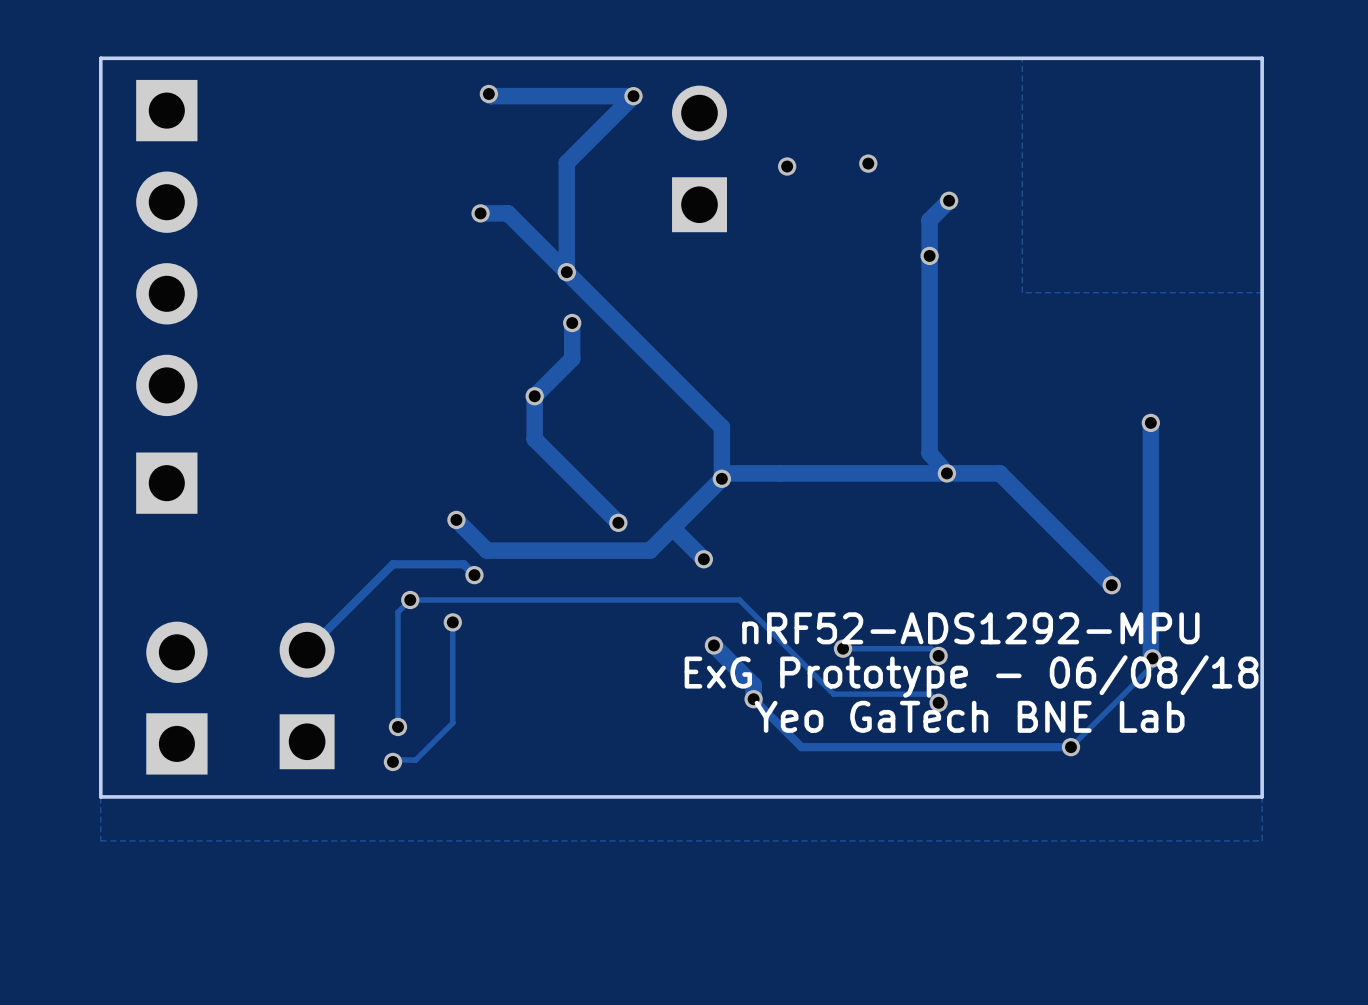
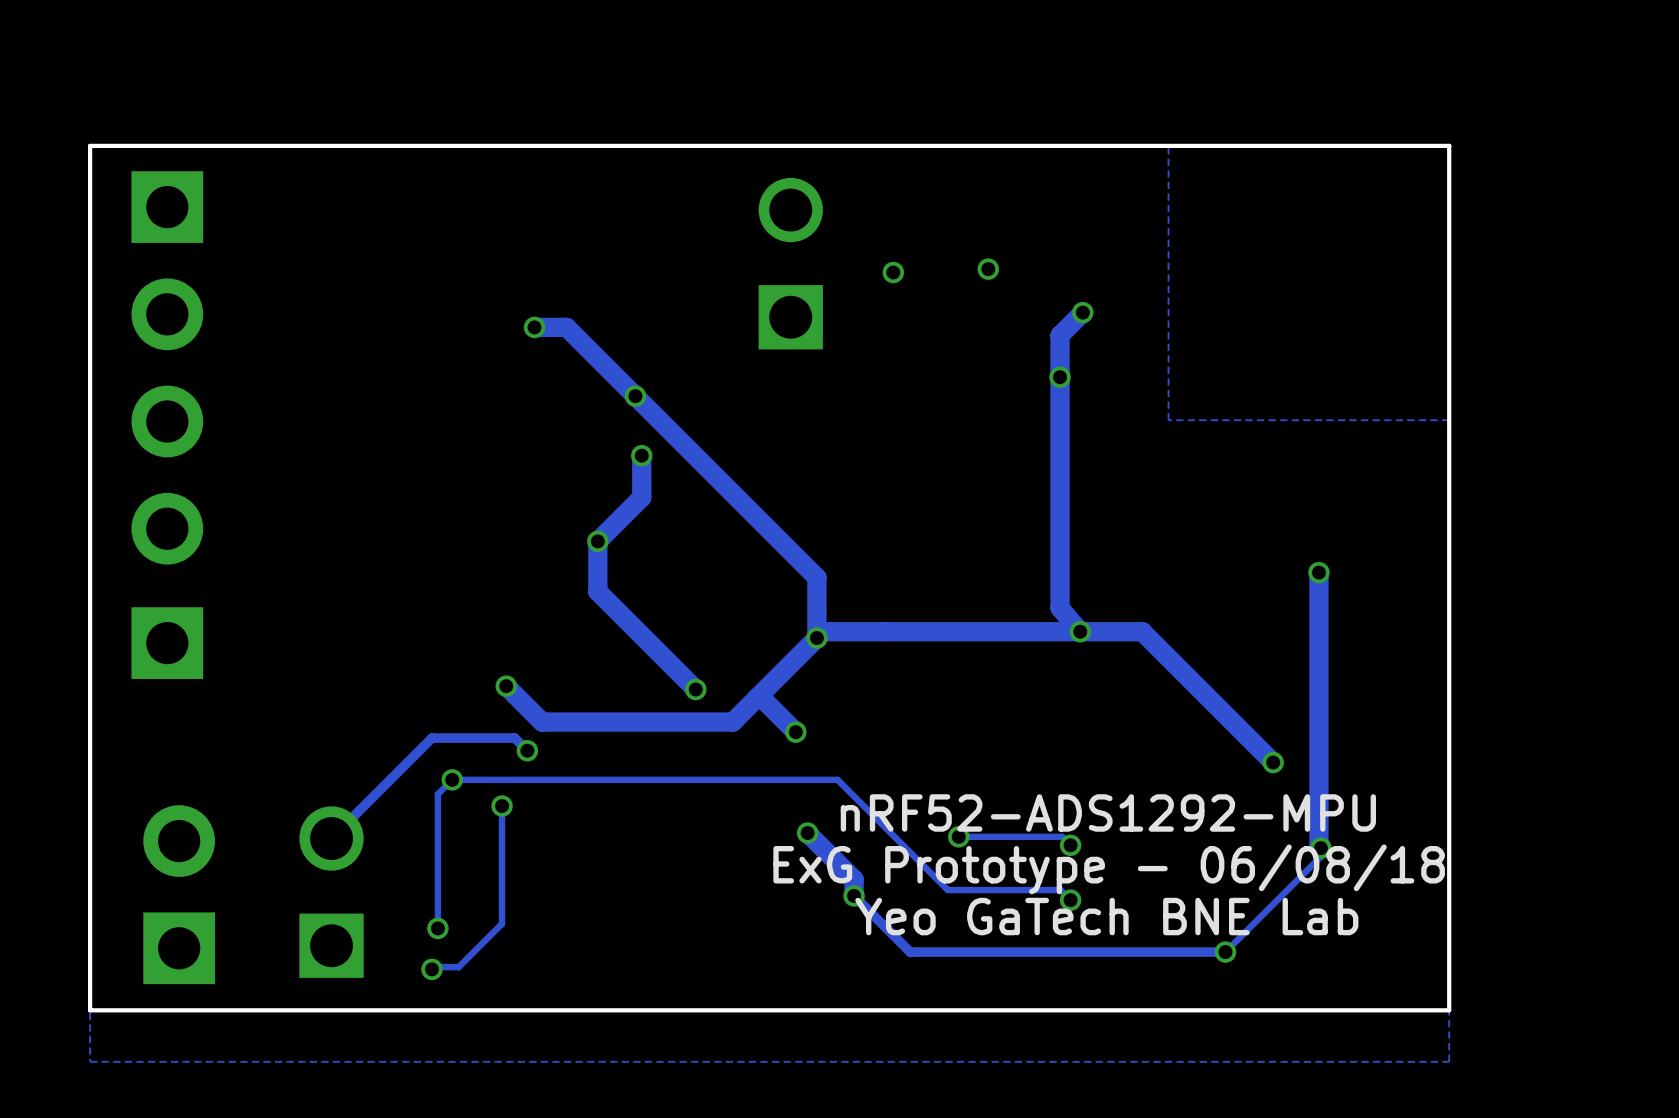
track: (488, 94) (491, 96) (633, 96) (566, 162) (566, 272) -> none
via: (488, 94) -> none
via: (633, 96) -> none

